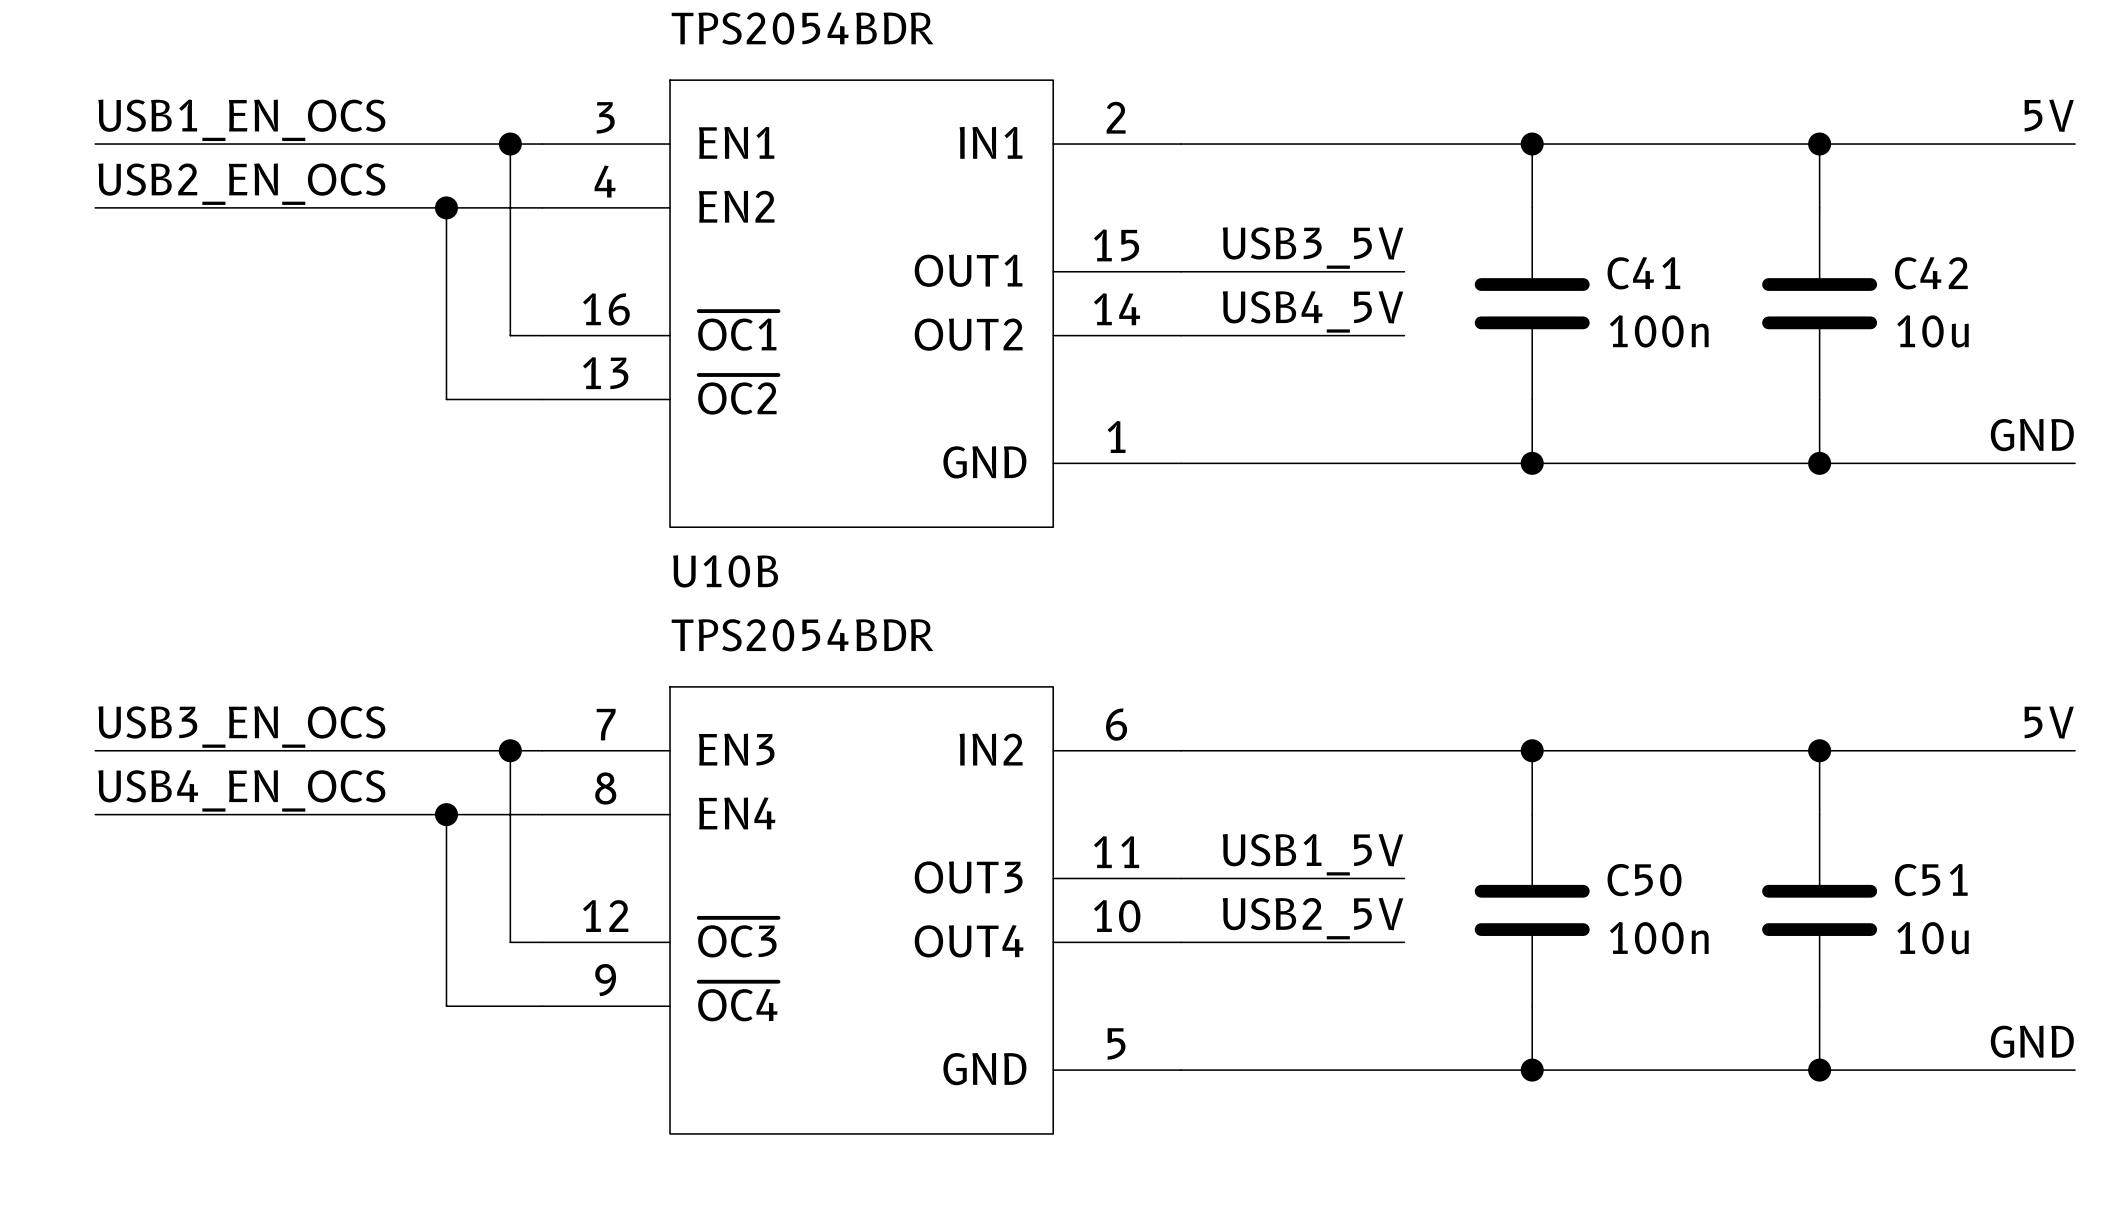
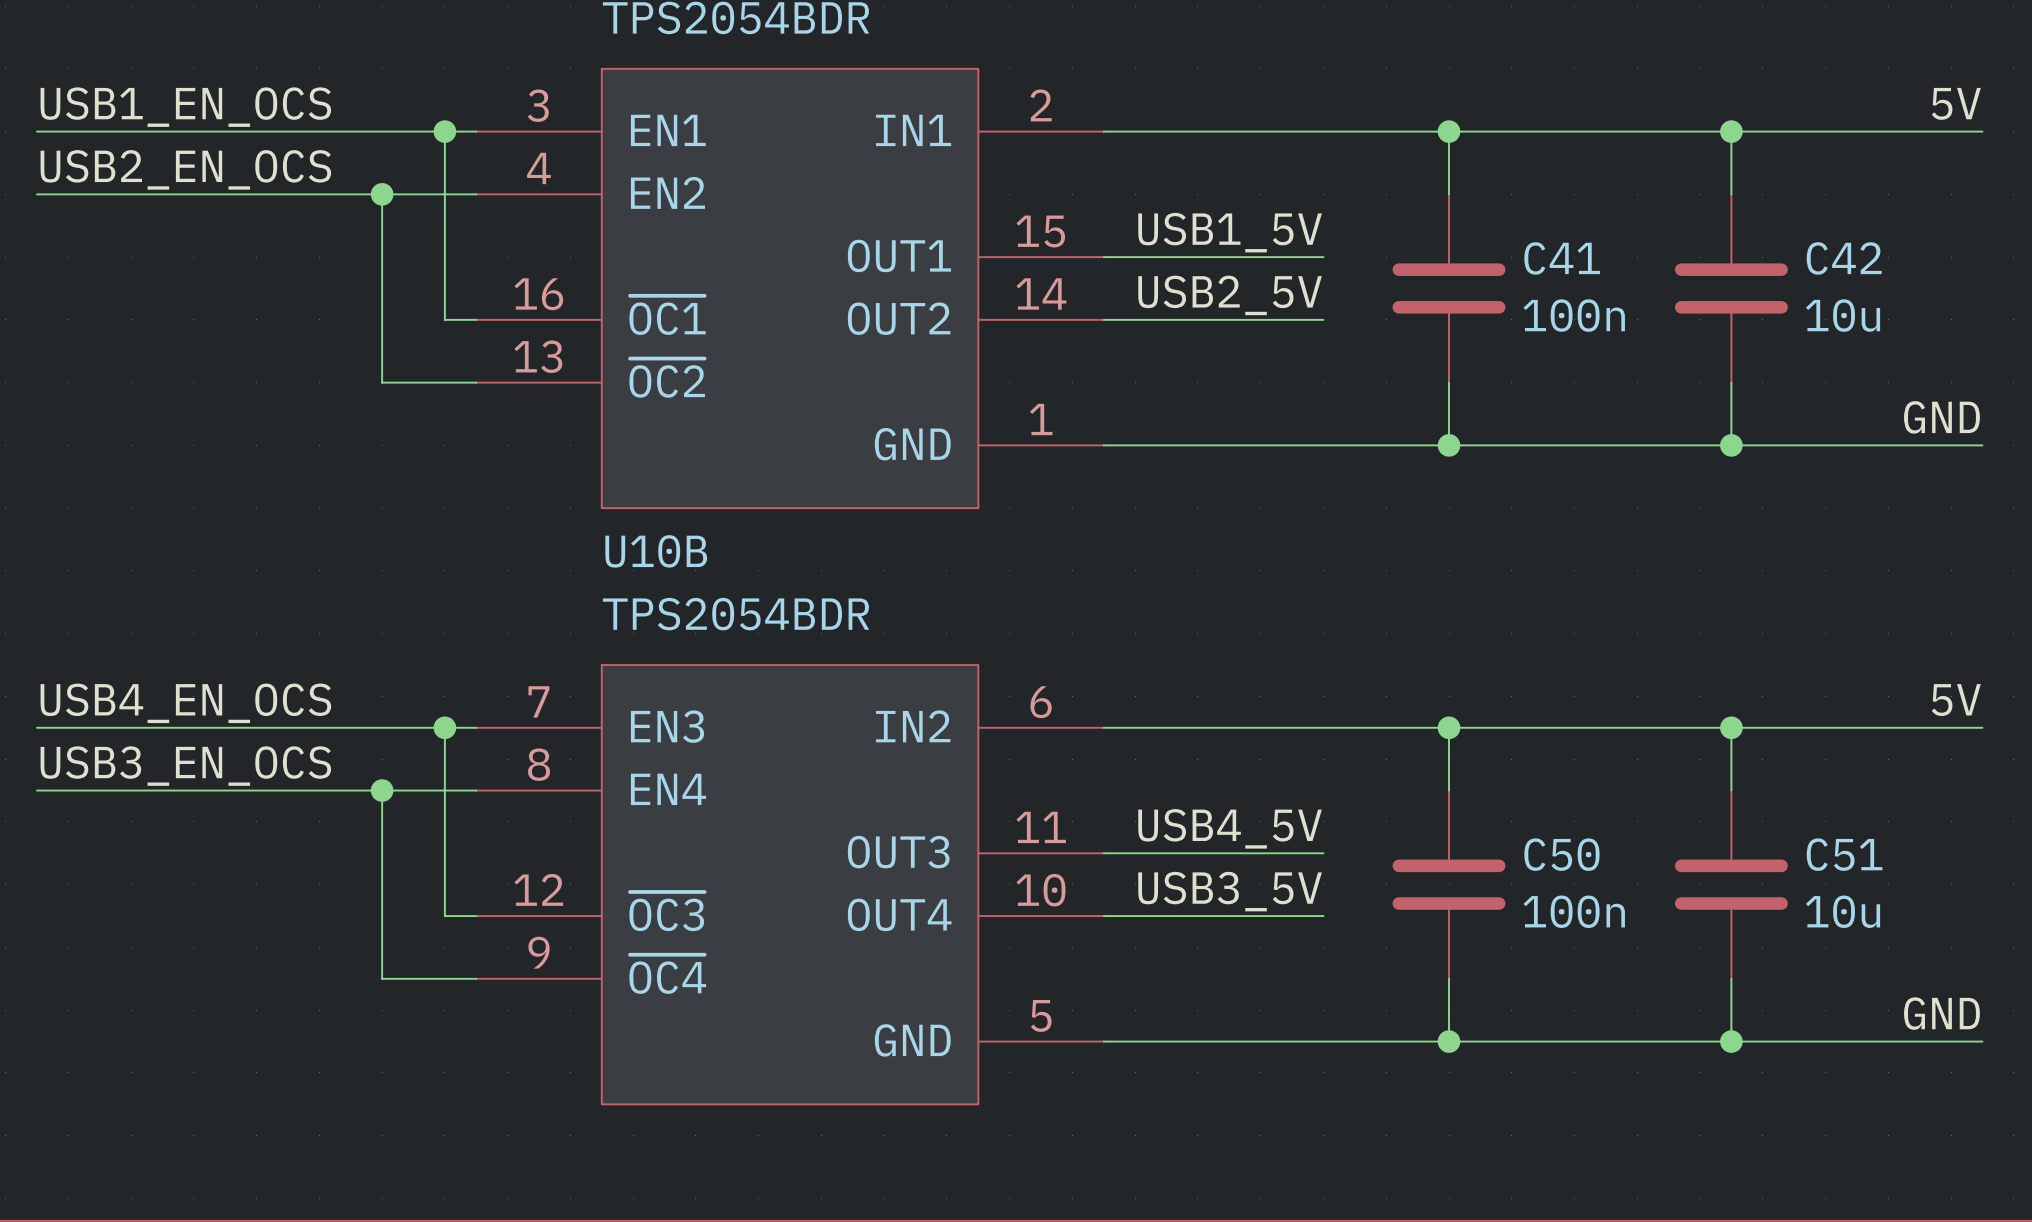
label: USB3_5V (1312, 248) -> USB1_5V (1230, 232)
label: USB4_5V (1312, 311) -> USB2_5V (1230, 295)
label: USB3_EN_OCS (241, 727) -> USB4_EN_OCS (185, 703)
label: USB4_EN_OCS (241, 790) -> USB3_EN_OCS (185, 766)
label: USB1_5V (1312, 854) -> USB4_5V (1230, 828)
label: USB2_5V (1312, 918) -> USB3_5V (1230, 891)

